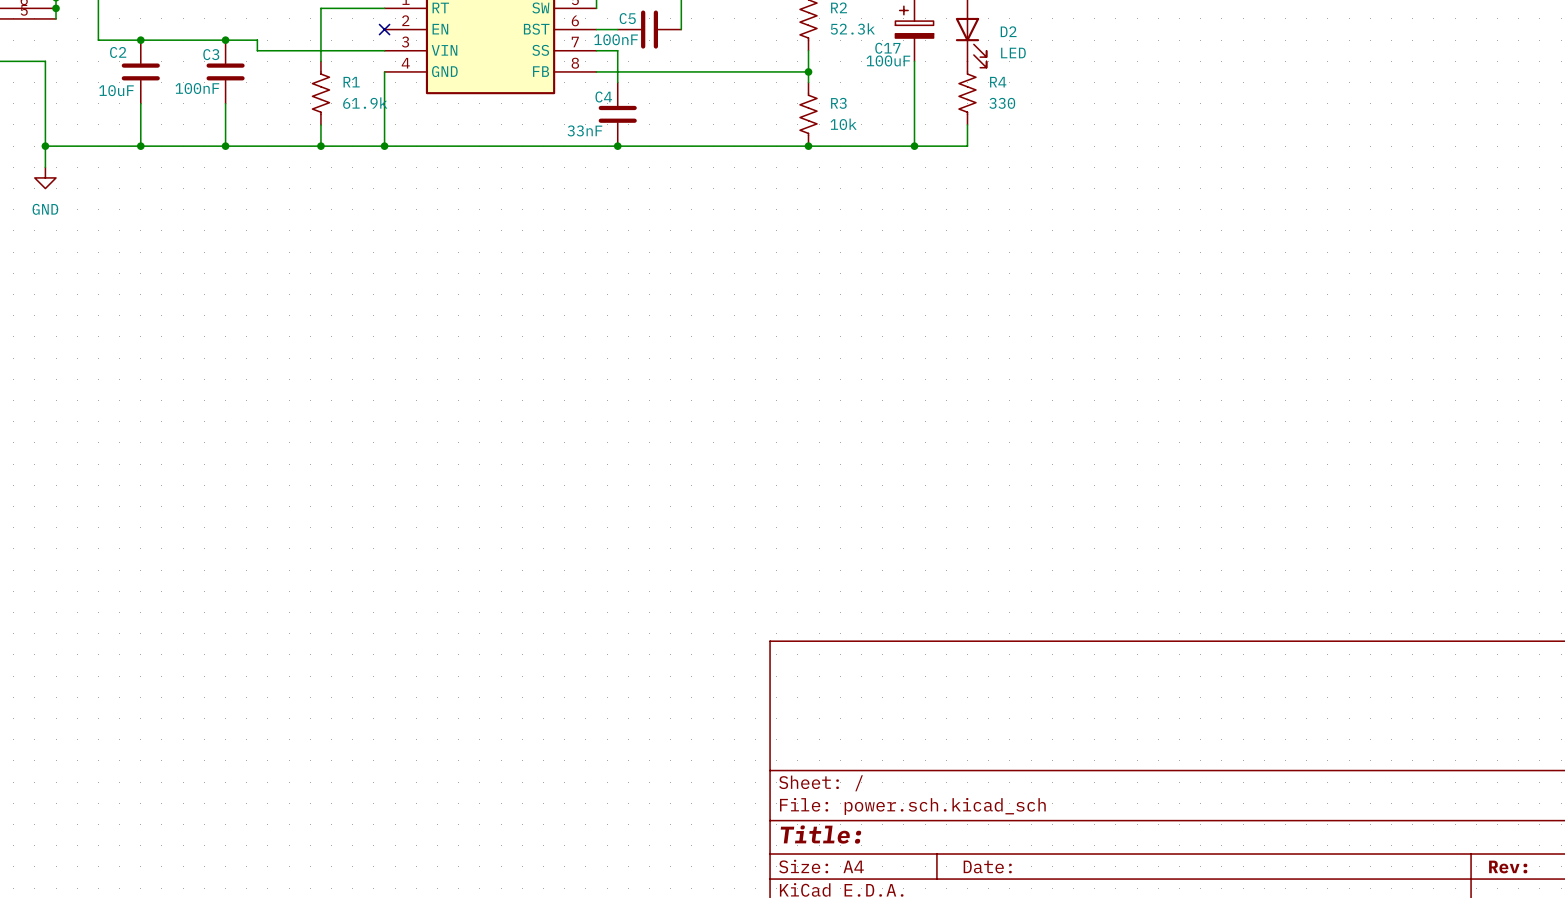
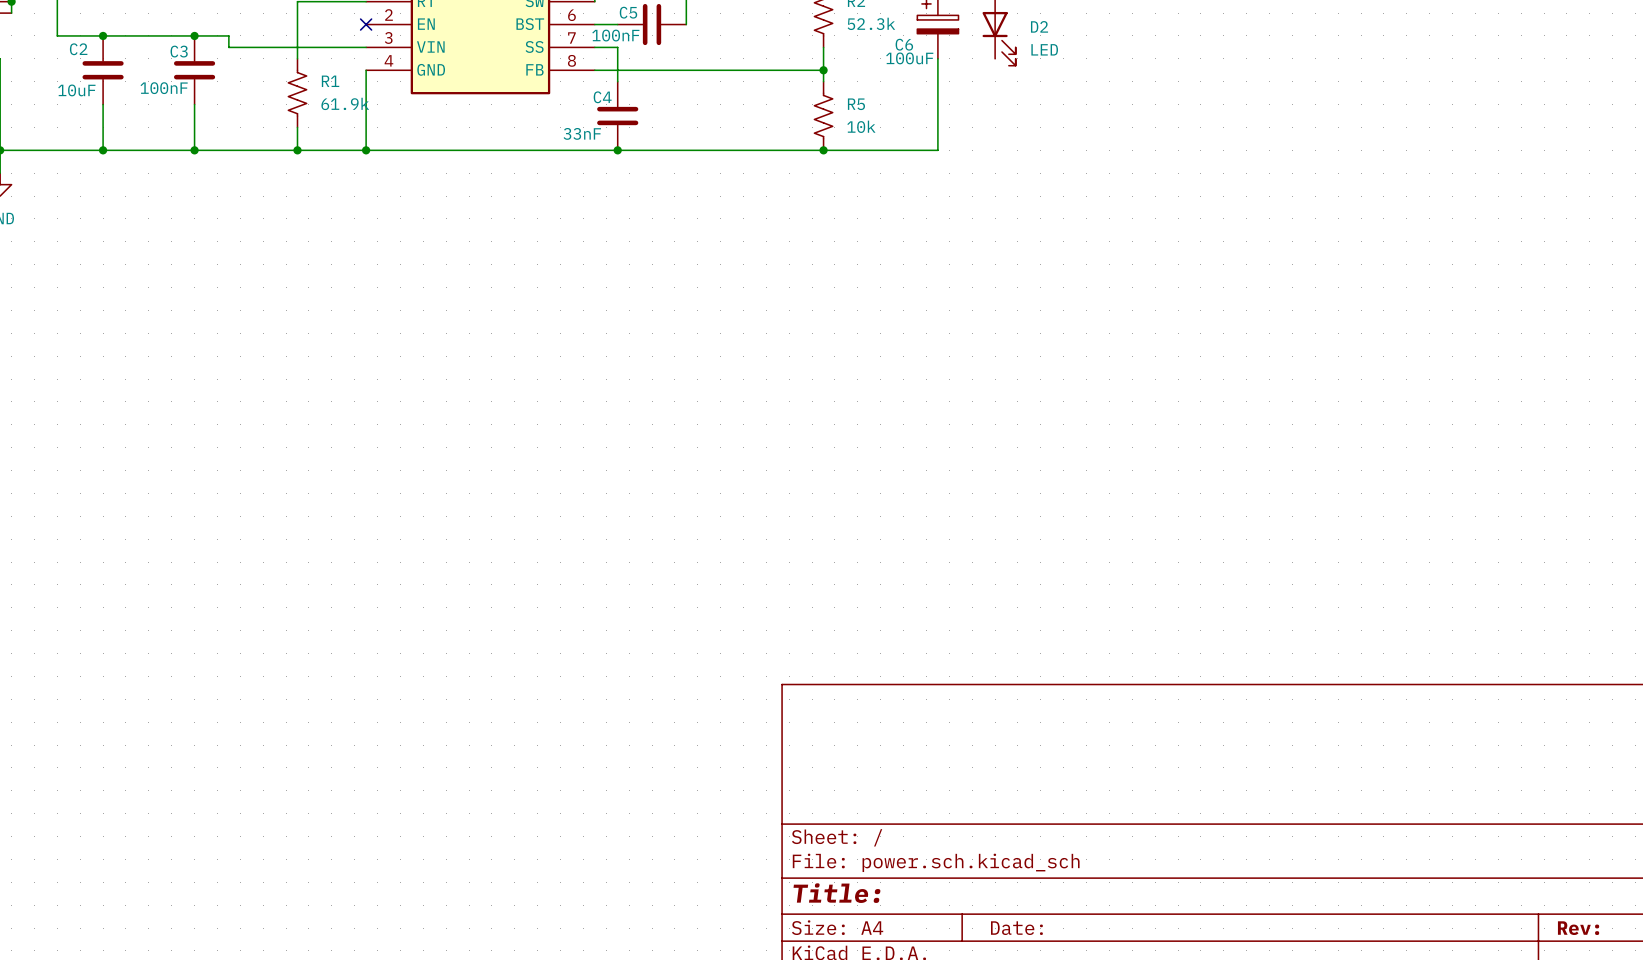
C17 name: C17 (887, 48) -> C6 (904, 44)
R4: 330 (967, 93) -> none
R3 name: R3 (838, 103) -> R5 (856, 104)
wire: (967, 124) (967, 146) (914, 146) -> none
junction: (914, 146) -> none

